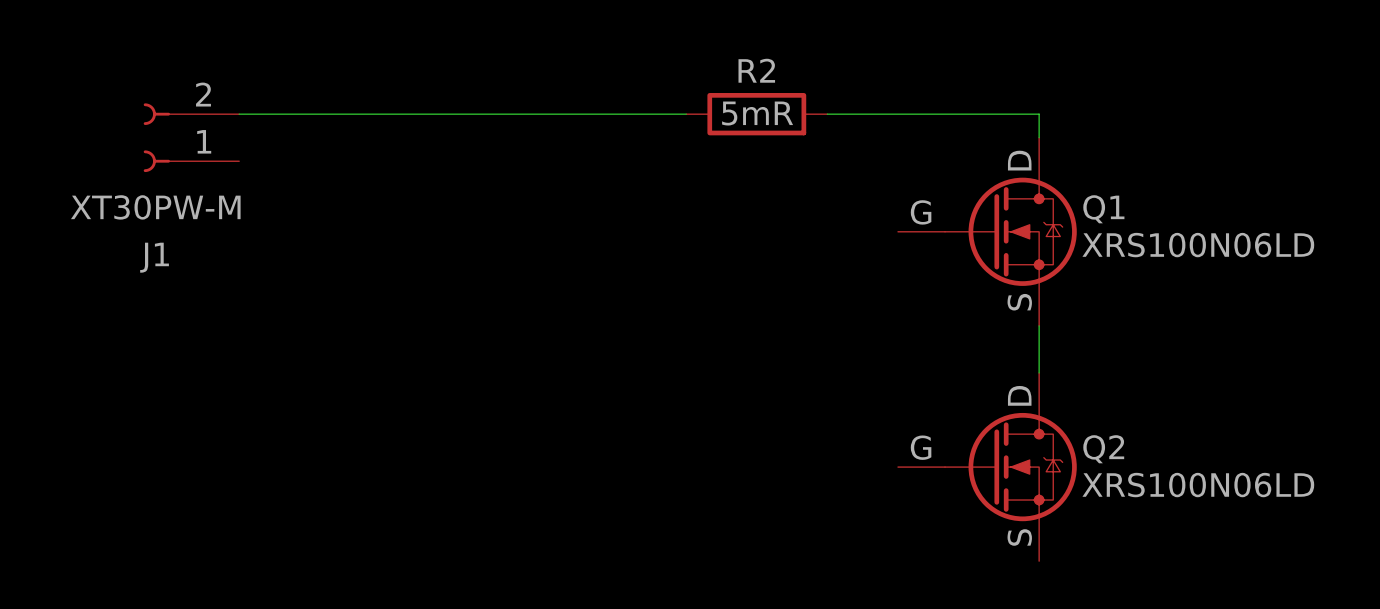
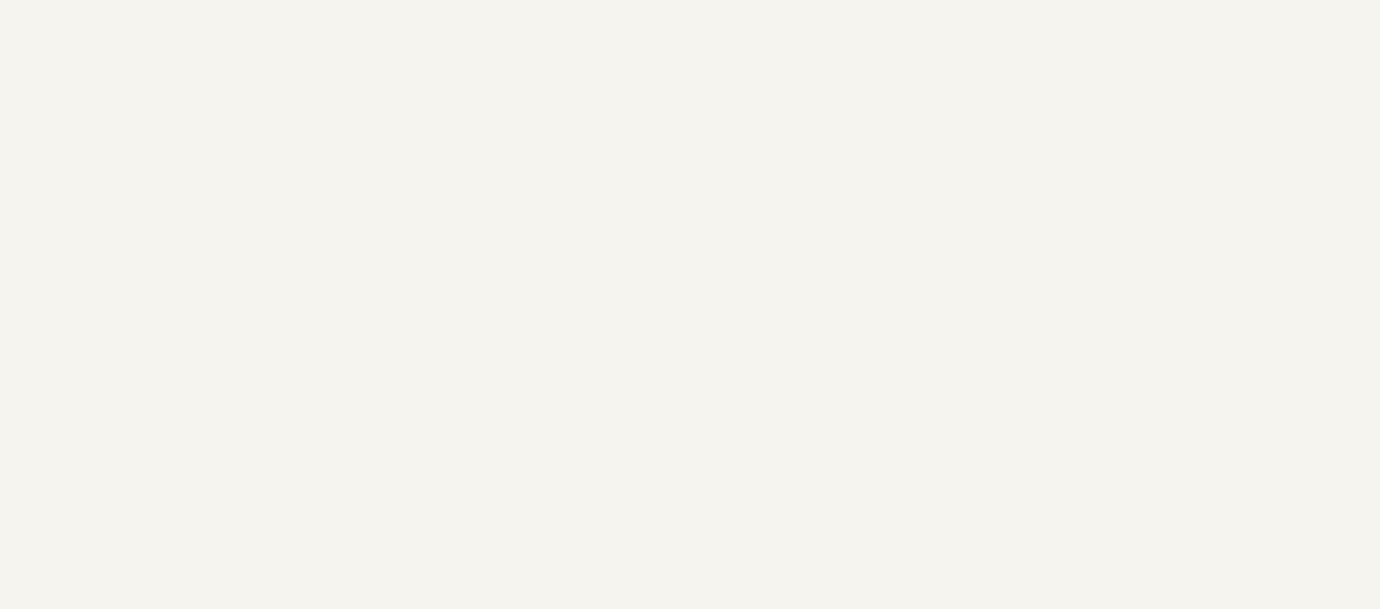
wire: (239, 114) (686, 114) -> none
R2: 5mR (756, 114) -> none
wire: (827, 114) (1039, 114) (1039, 137) -> none
J1: XT30PW-M (191, 137) -> none
Q1: XRS100N06LD (987, 231) -> none
wire: (1039, 325) (1039, 372) -> none
Q2: XRS100N06LD (987, 467) -> none

